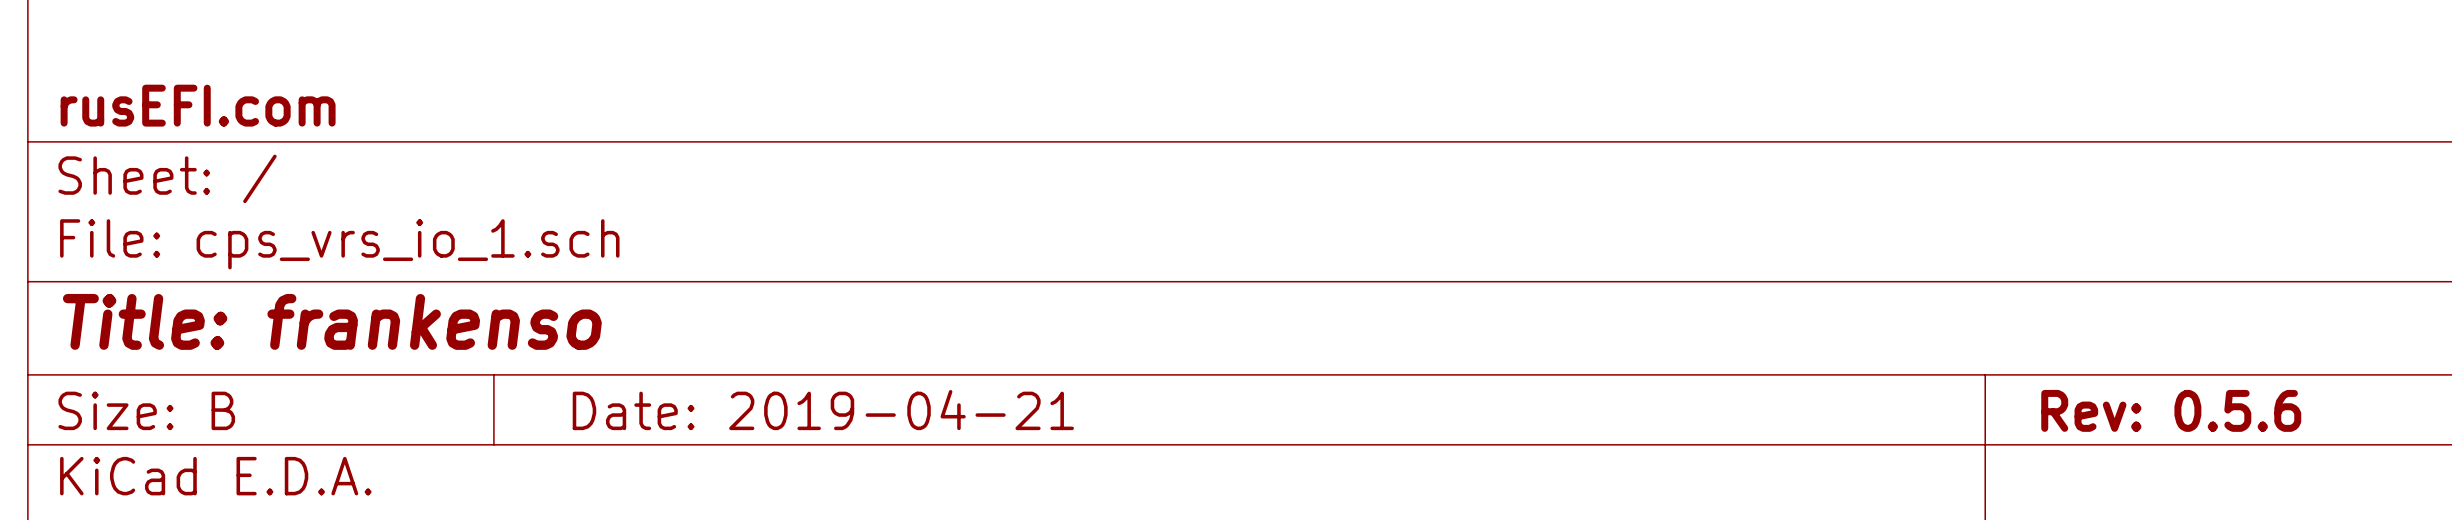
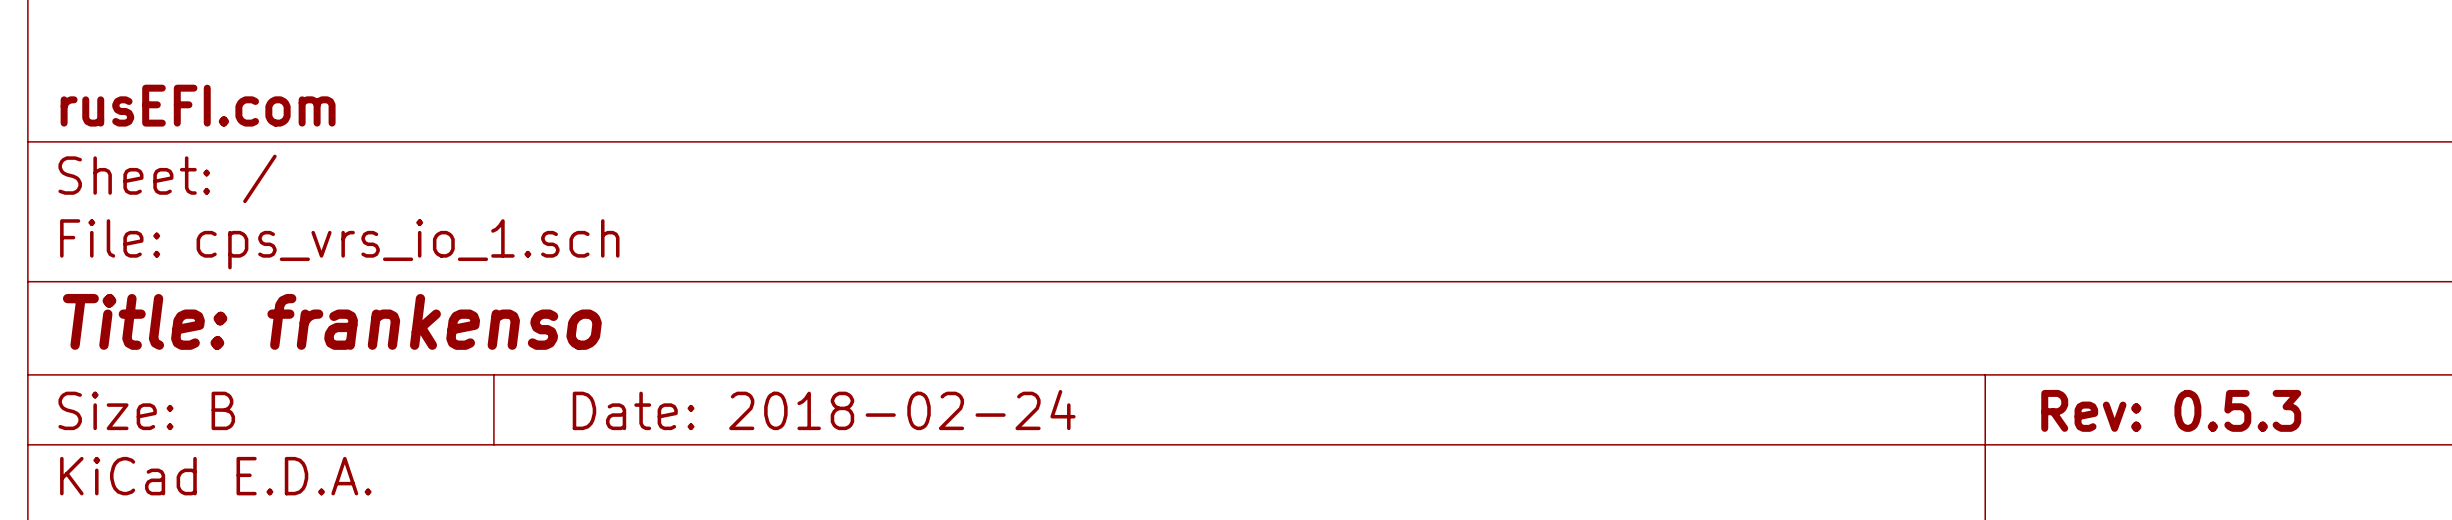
title block: Date: 2019-04-21 (823, 410) -> Date: 2018-02-24 (824, 410)
title block: Rev: 0.5.6 (2171, 410) -> Rev: 0.5.3 (2171, 410)

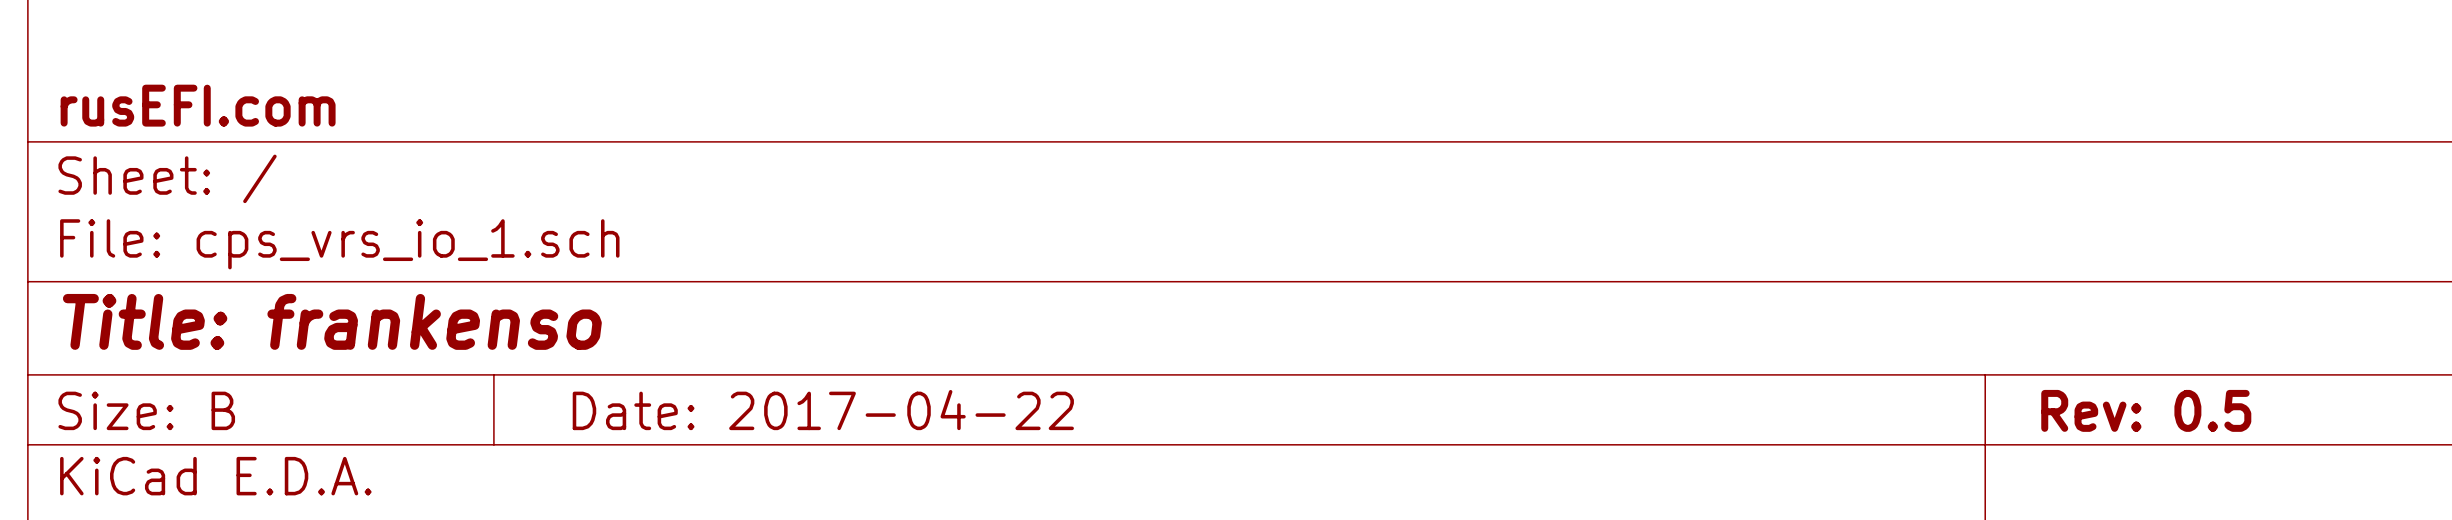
title block: Date: 2018-02-24 (824, 410) -> Date: 2017-04-22 (823, 410)
title block: Rev: 0.5.3 (2171, 410) -> Rev: 0.5 (2146, 410)

